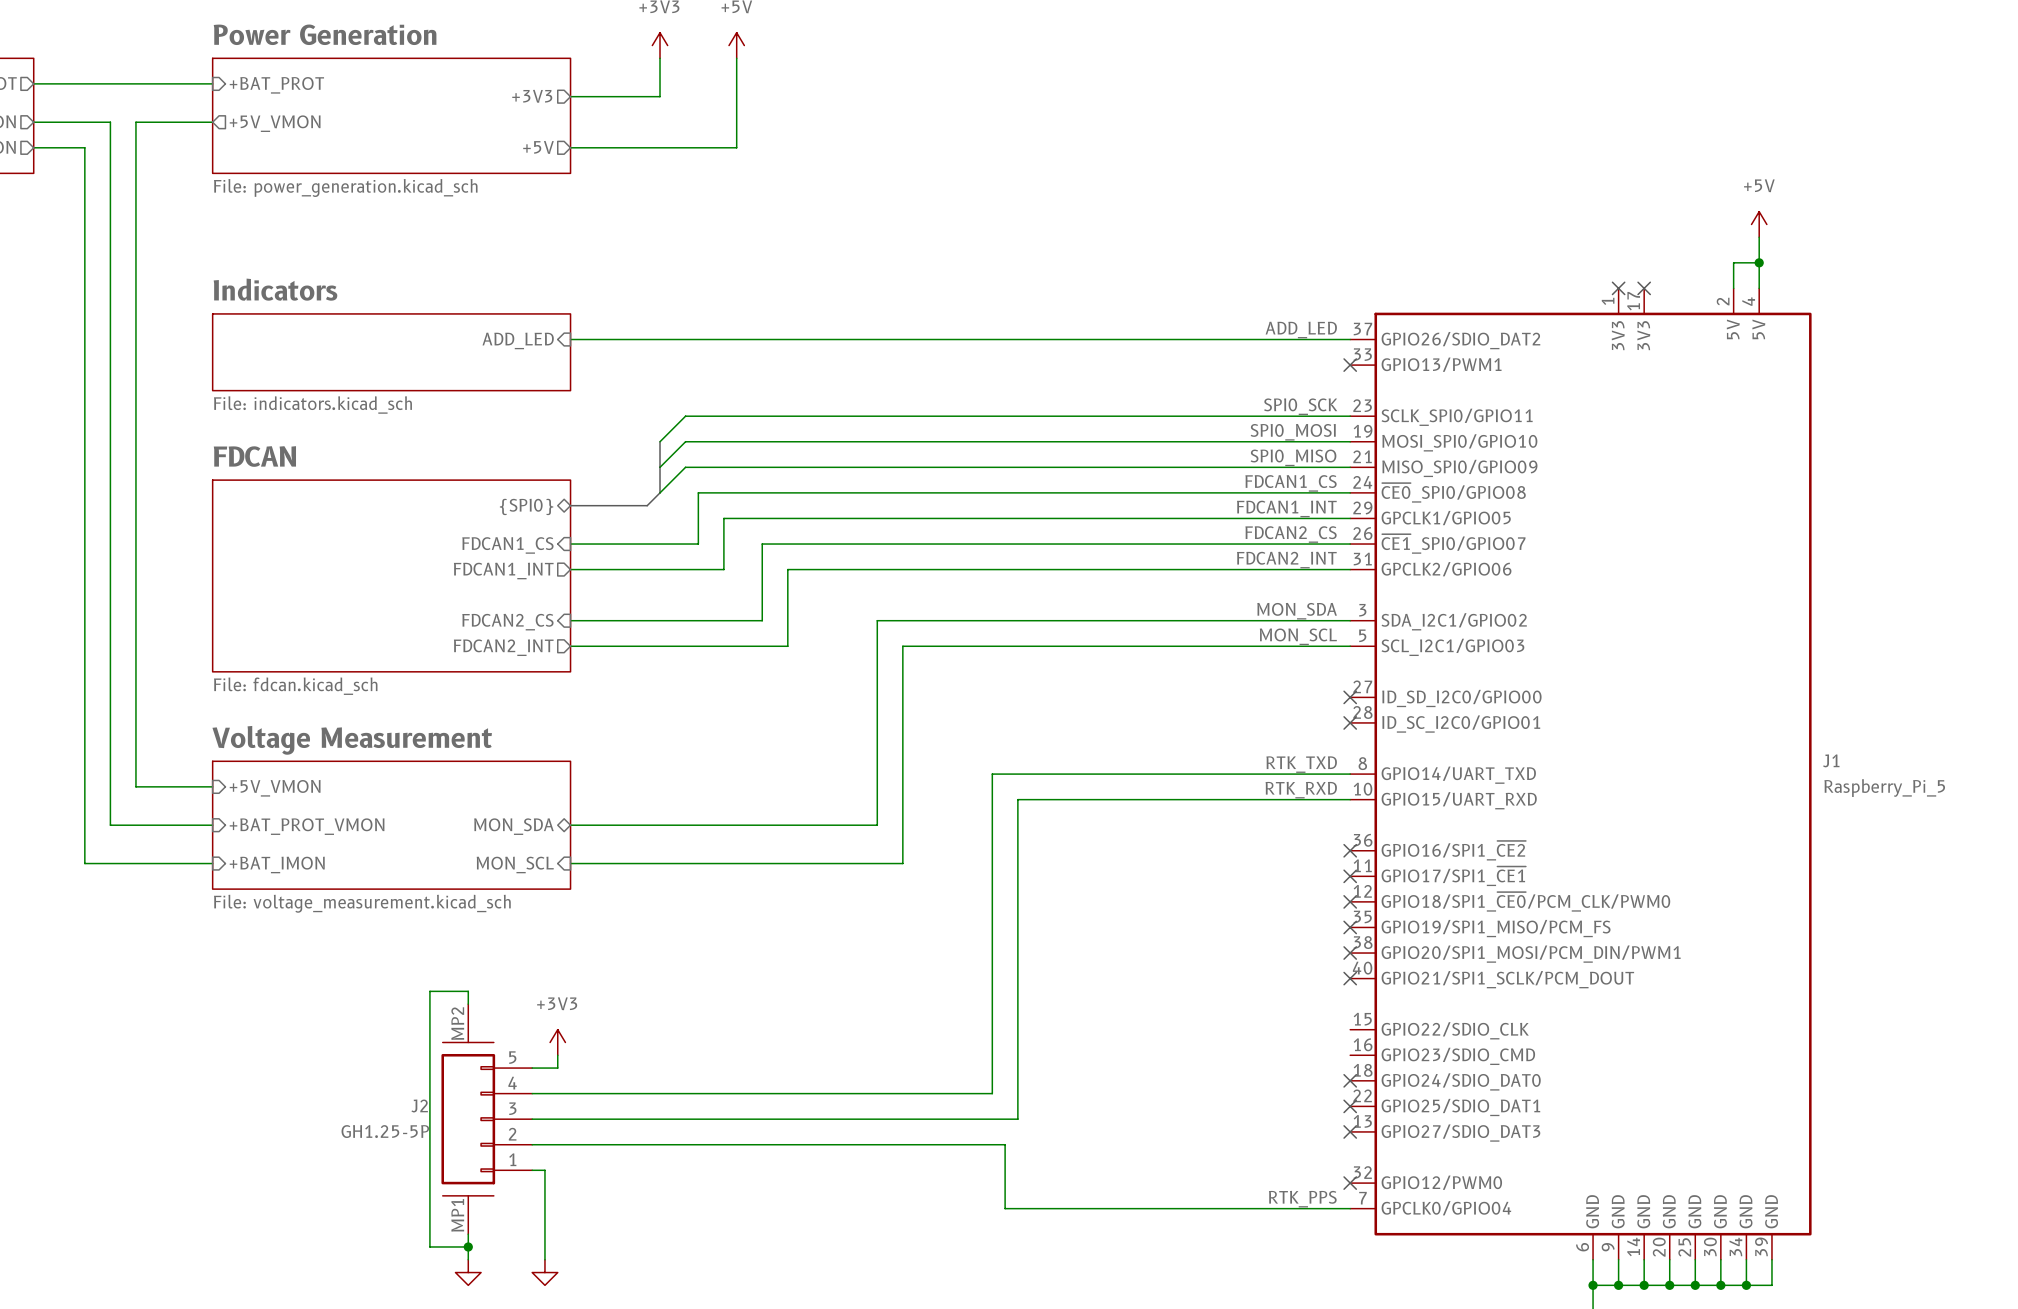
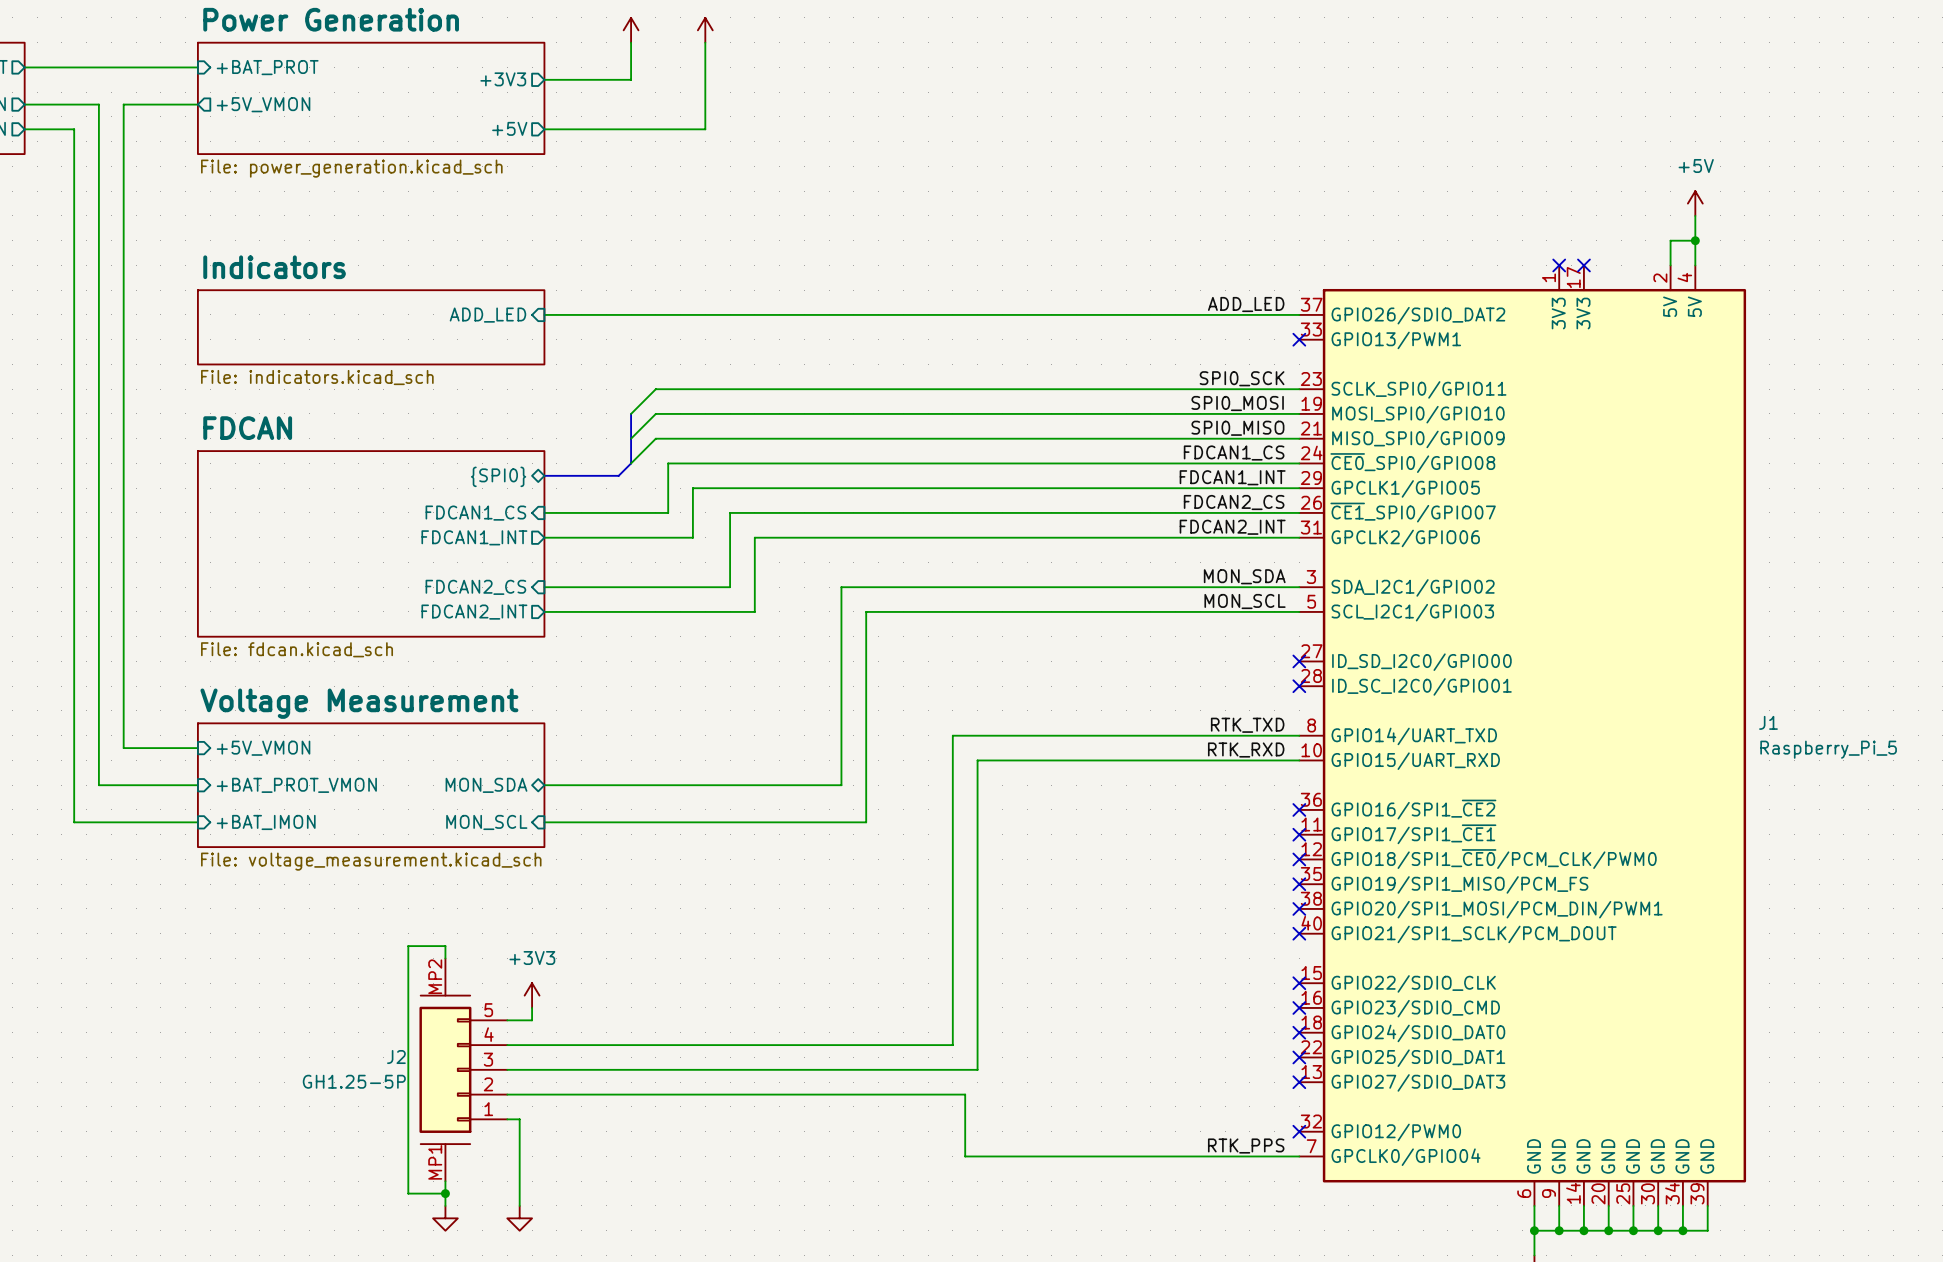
no-connect mark: none -> (1299, 983)
no-connect mark: none -> (1299, 1007)

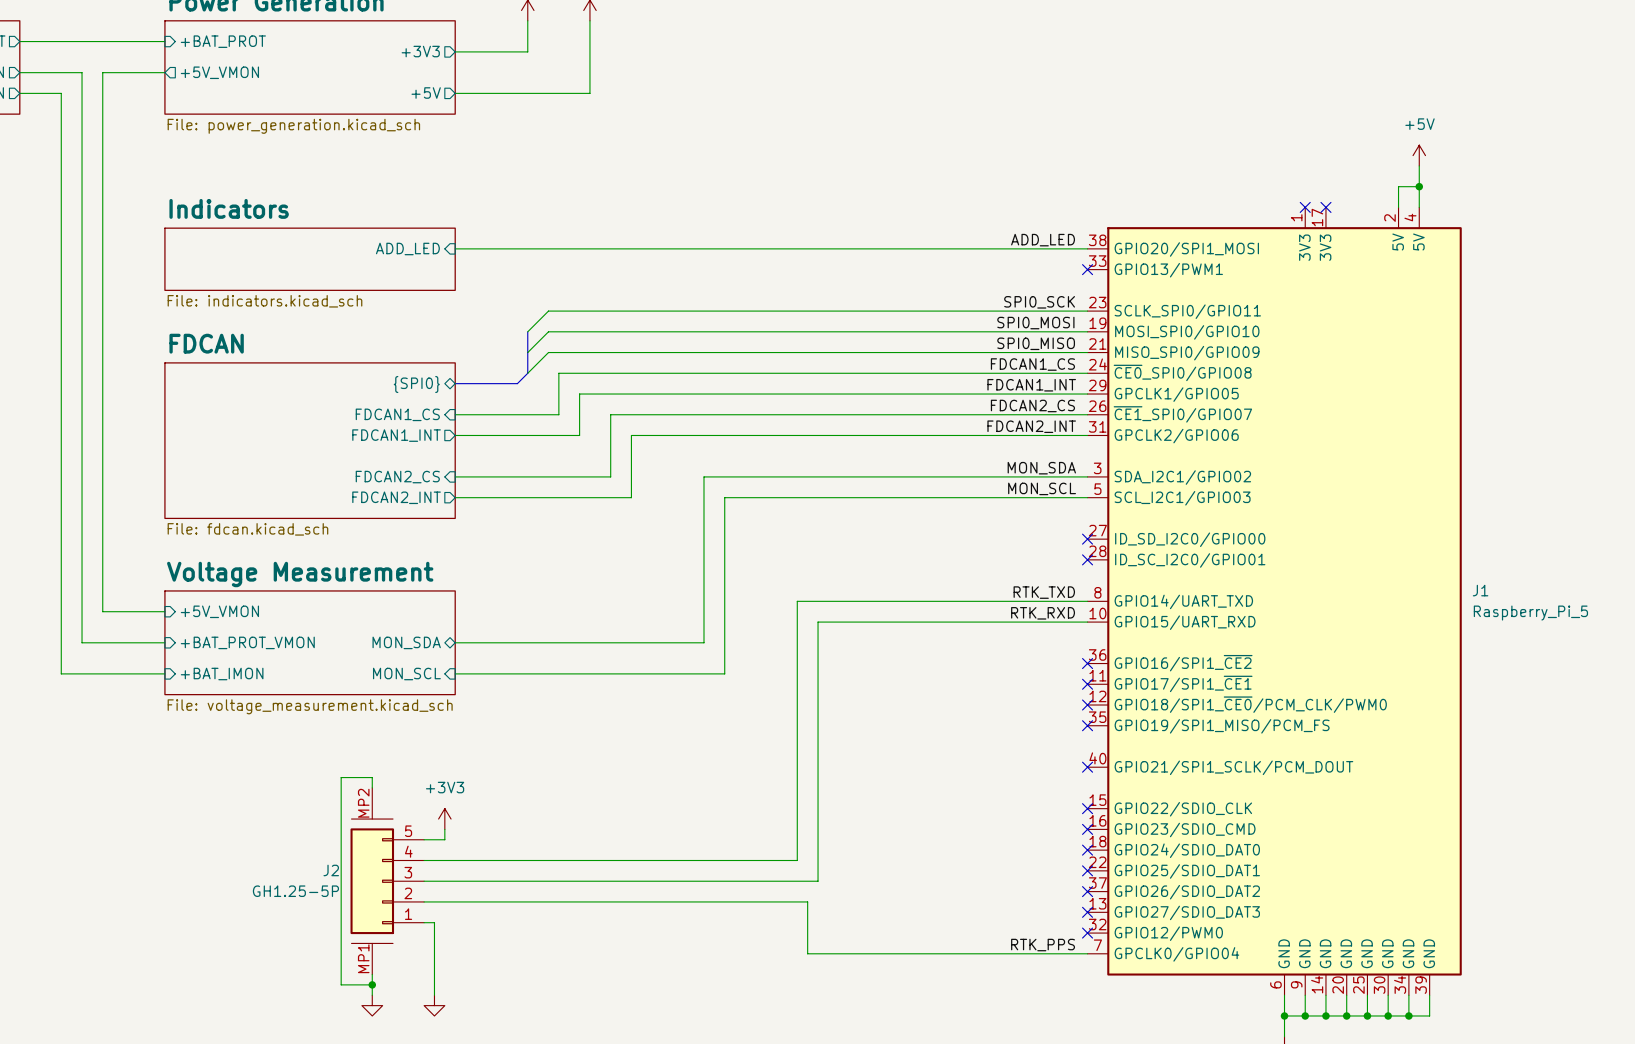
J1 symbol: [1299, 265, 1747, 1206] -> [1087, 207, 1462, 996]
no-connect mark: (1299, 908) -> none
no-connect mark: none -> (1087, 912)

